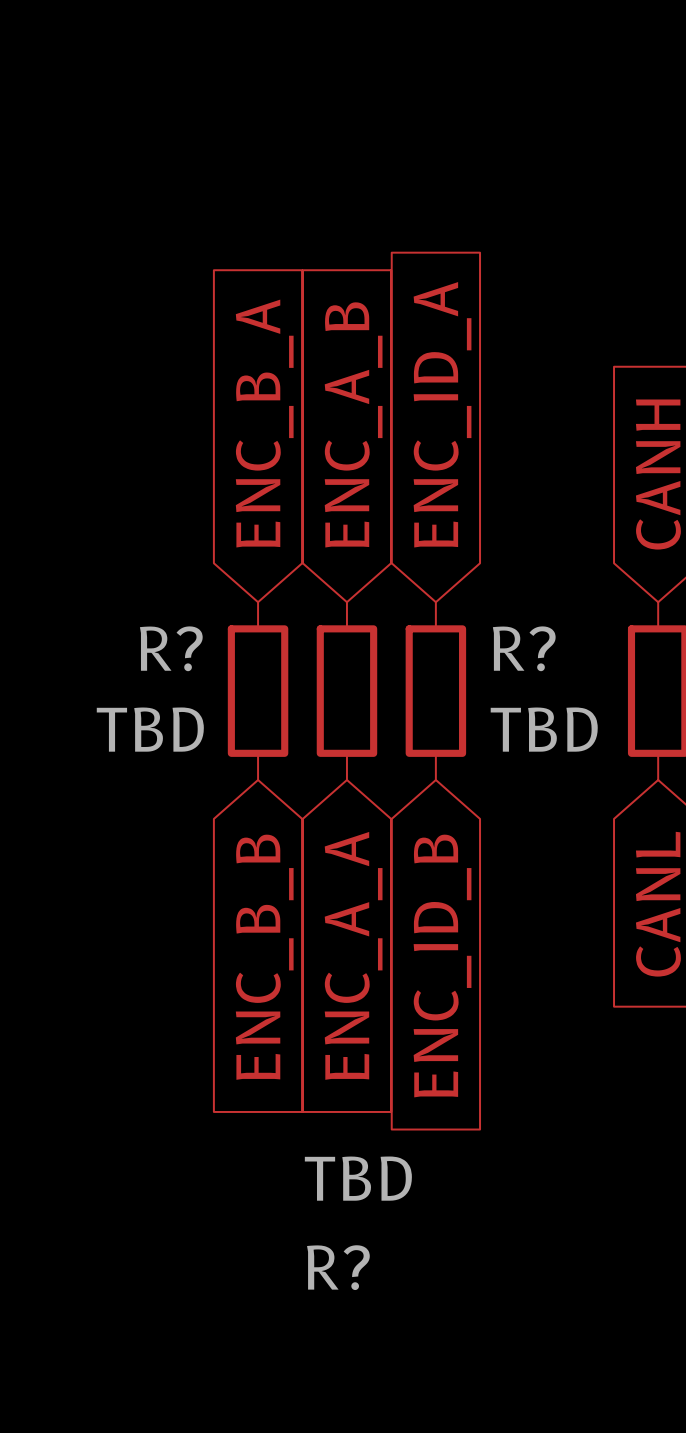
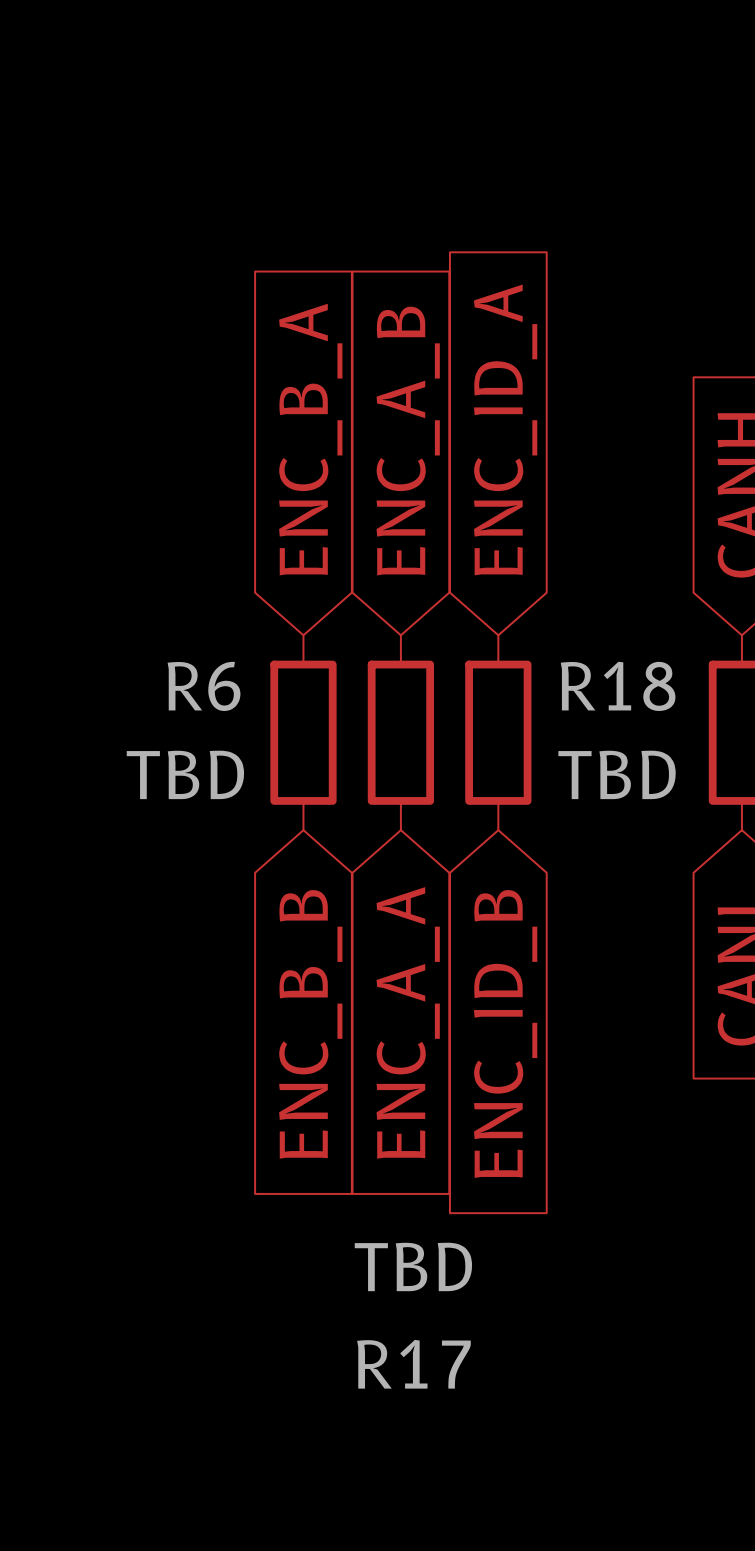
R? name: R? (171, 648) -> R6 (204, 686)
R? name: R? (524, 648) -> R18 (618, 686)
R? name: R? (338, 1267) -> R17 (413, 1364)

